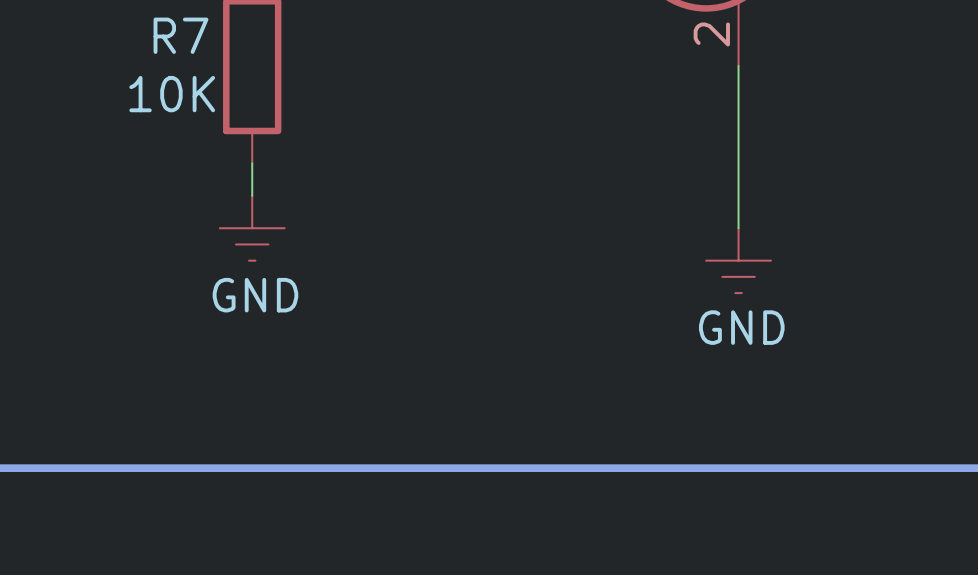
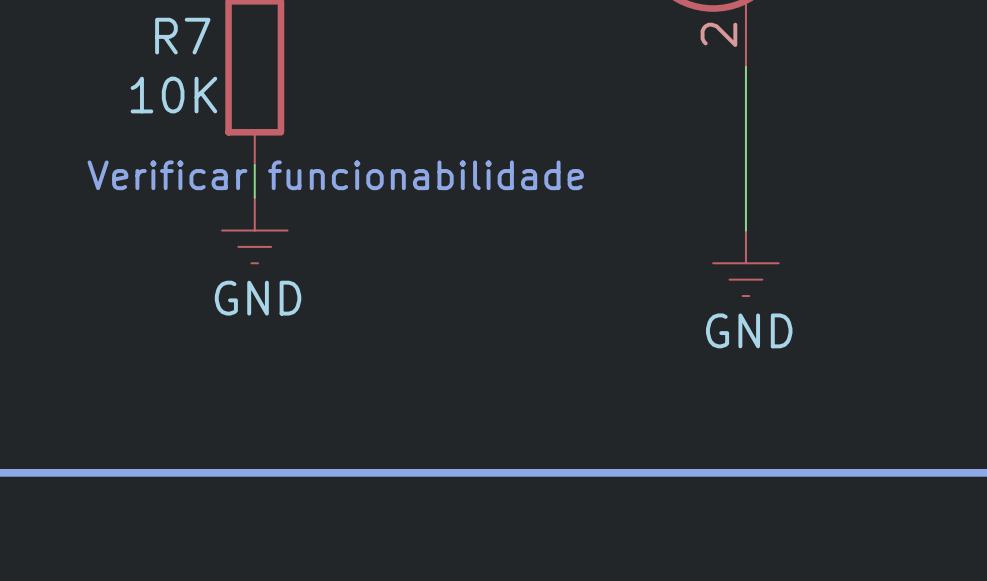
text: none -> Verificar funcionabilidade (335, 175)

